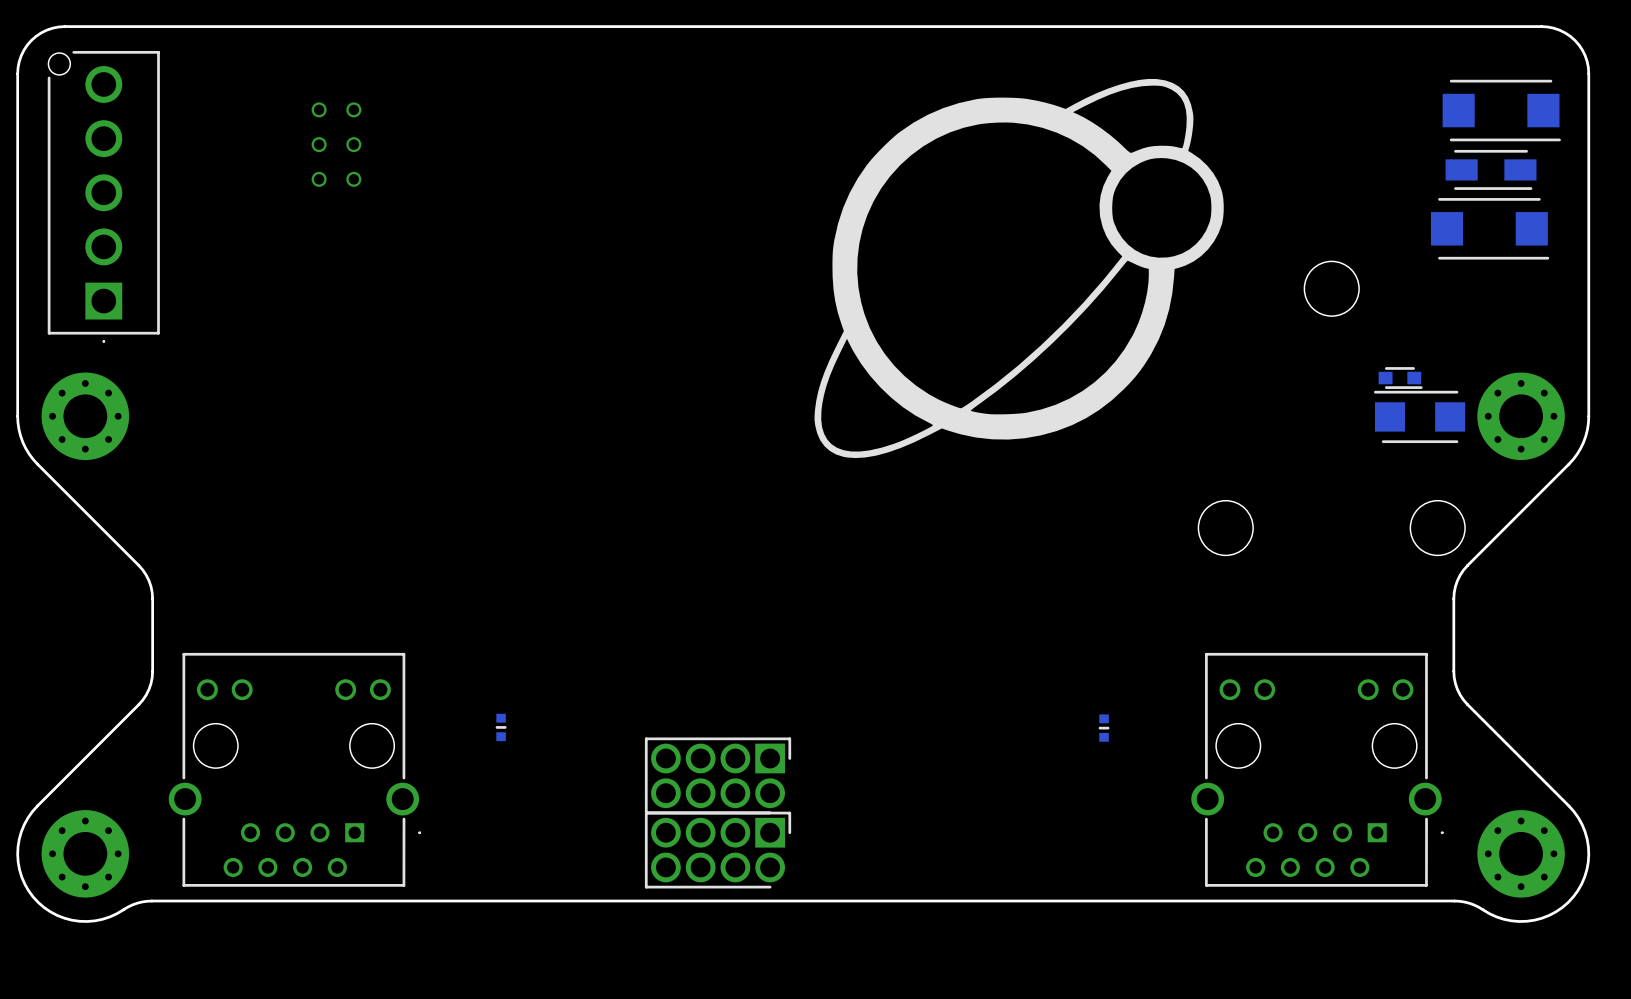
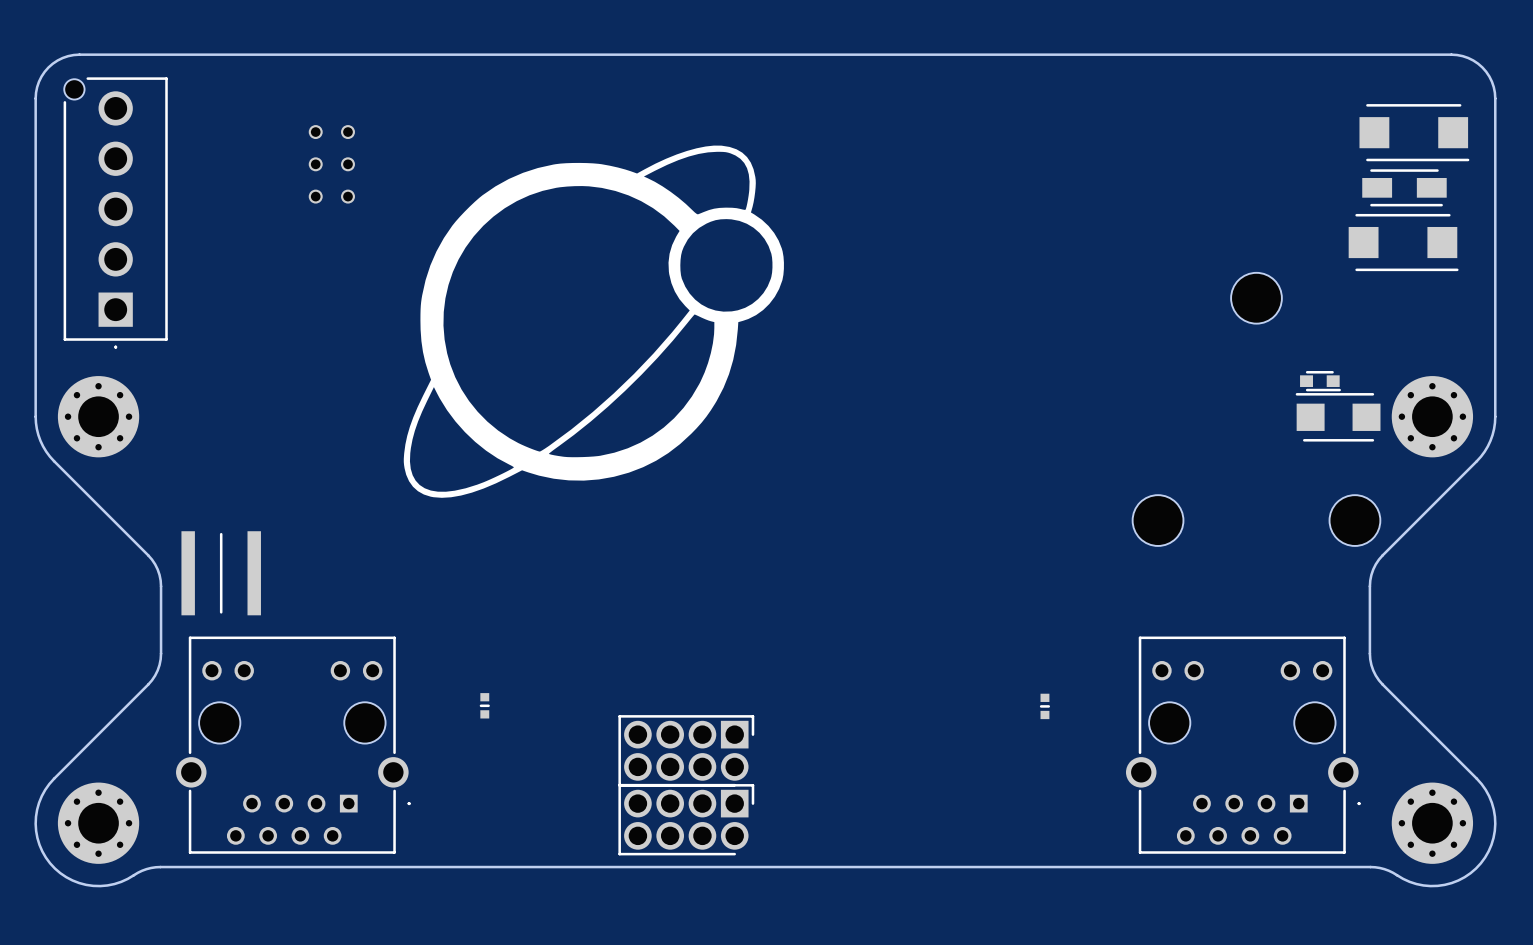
drawing: [814, 78, 1224, 459] -> none
drawing: none -> [403, 145, 784, 498]
part: none -> (221, 573)

